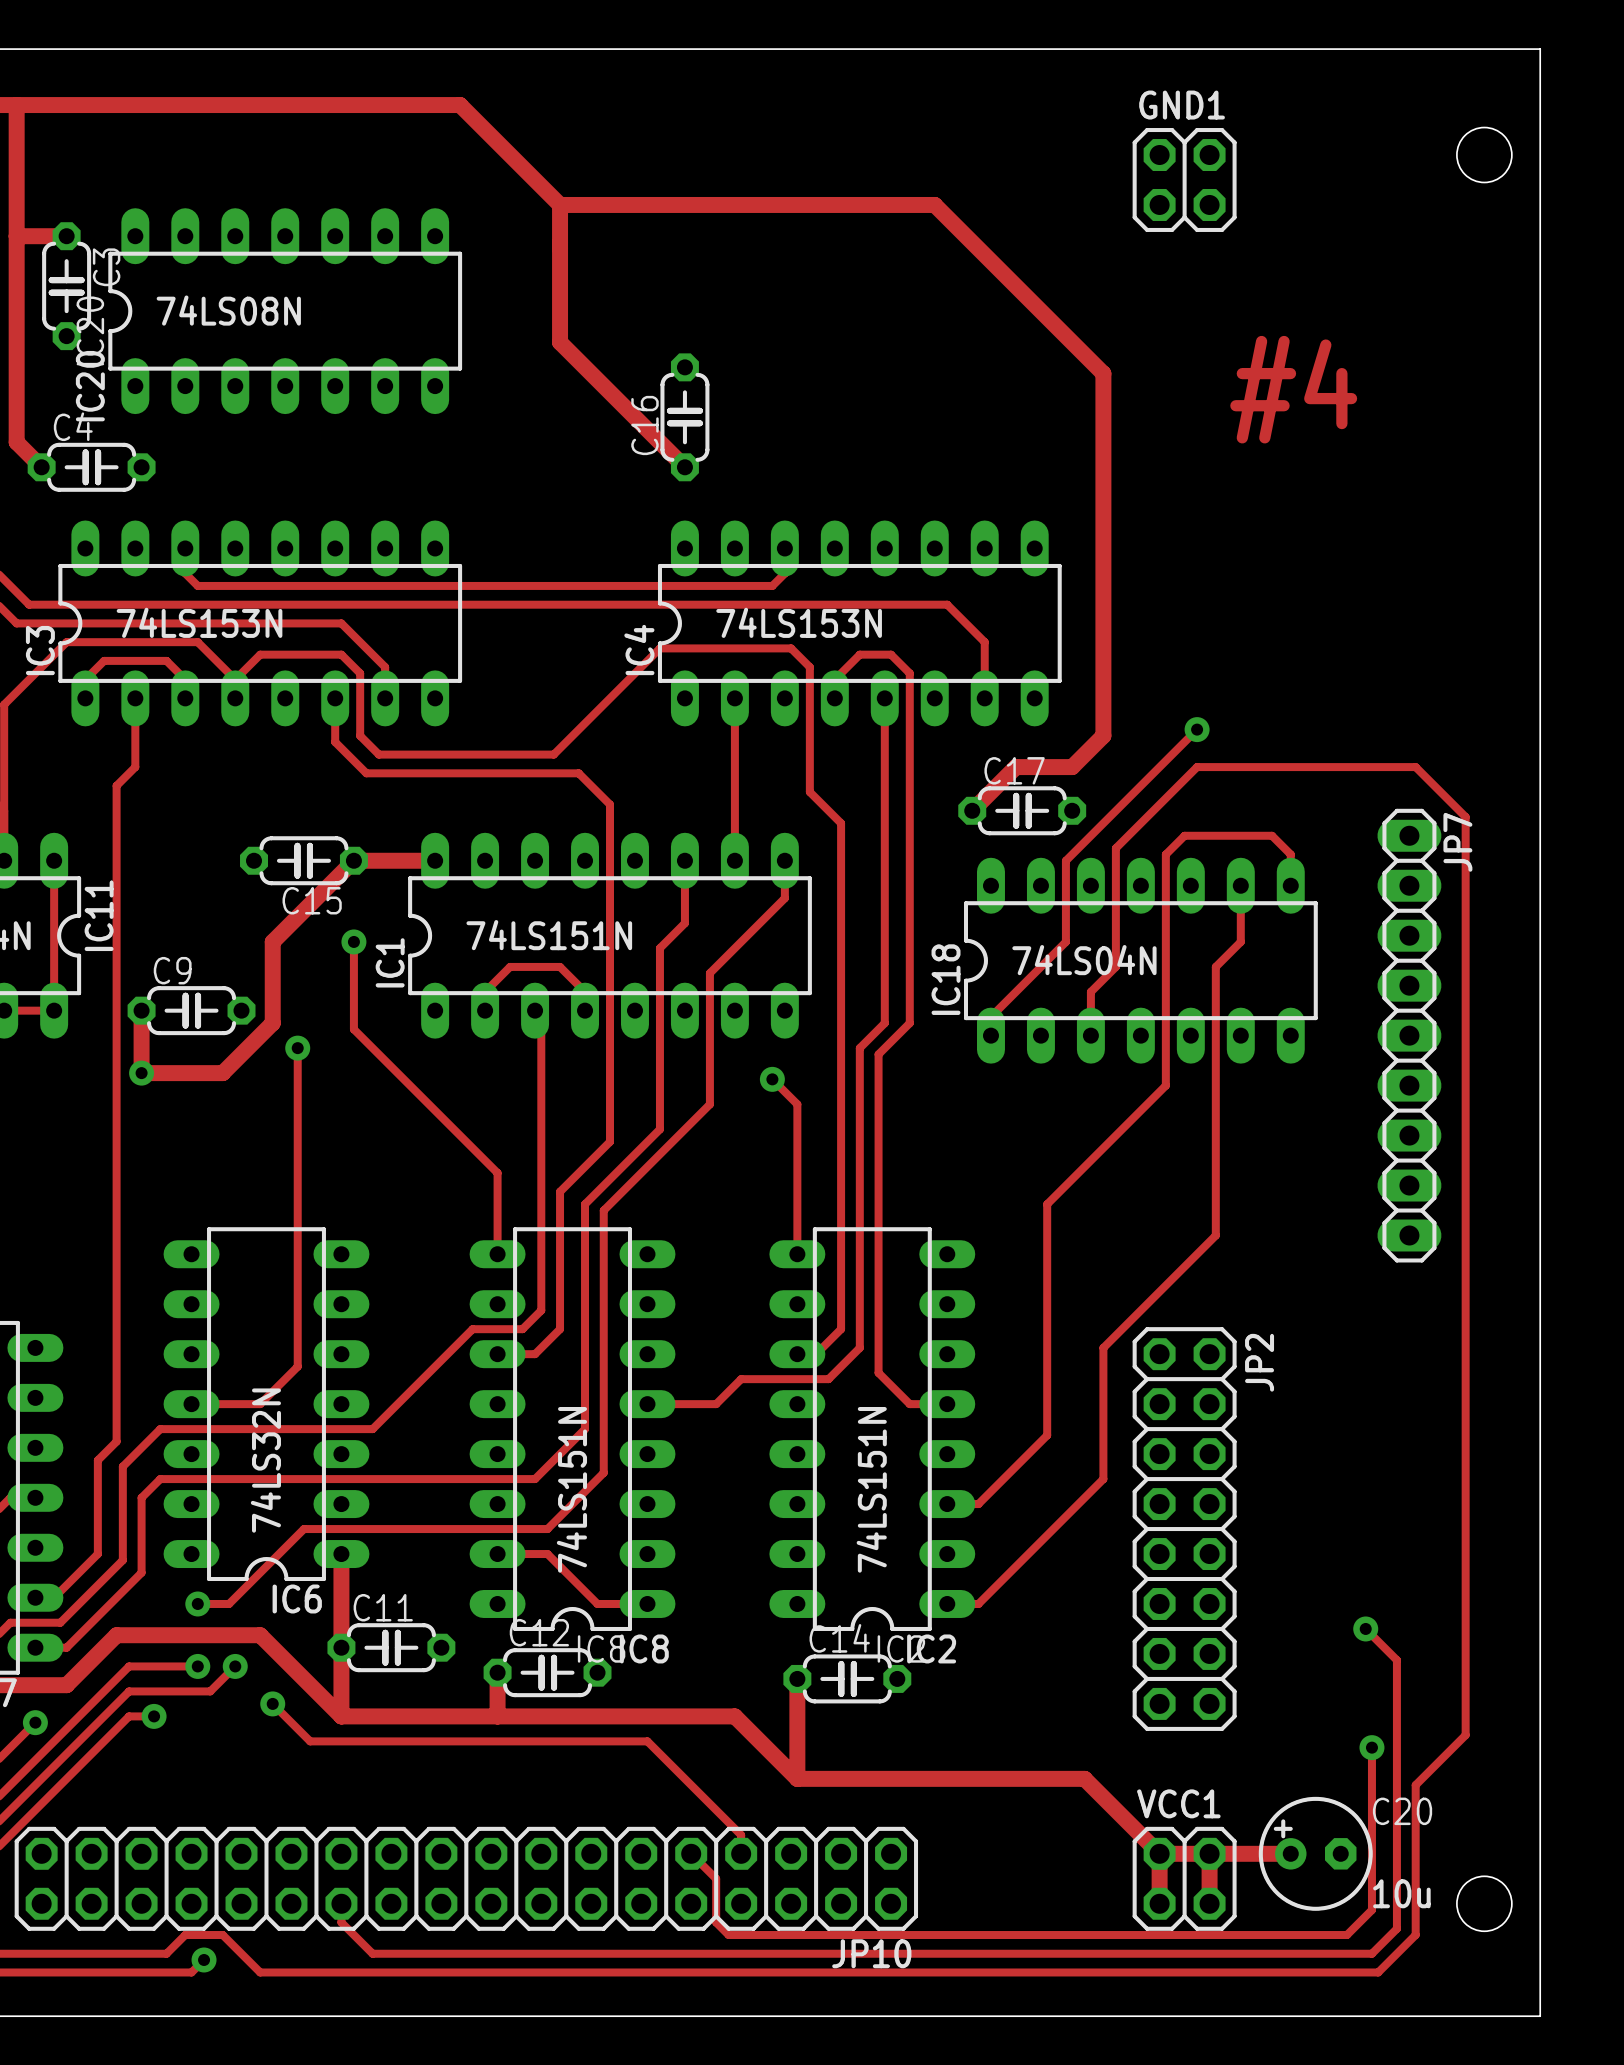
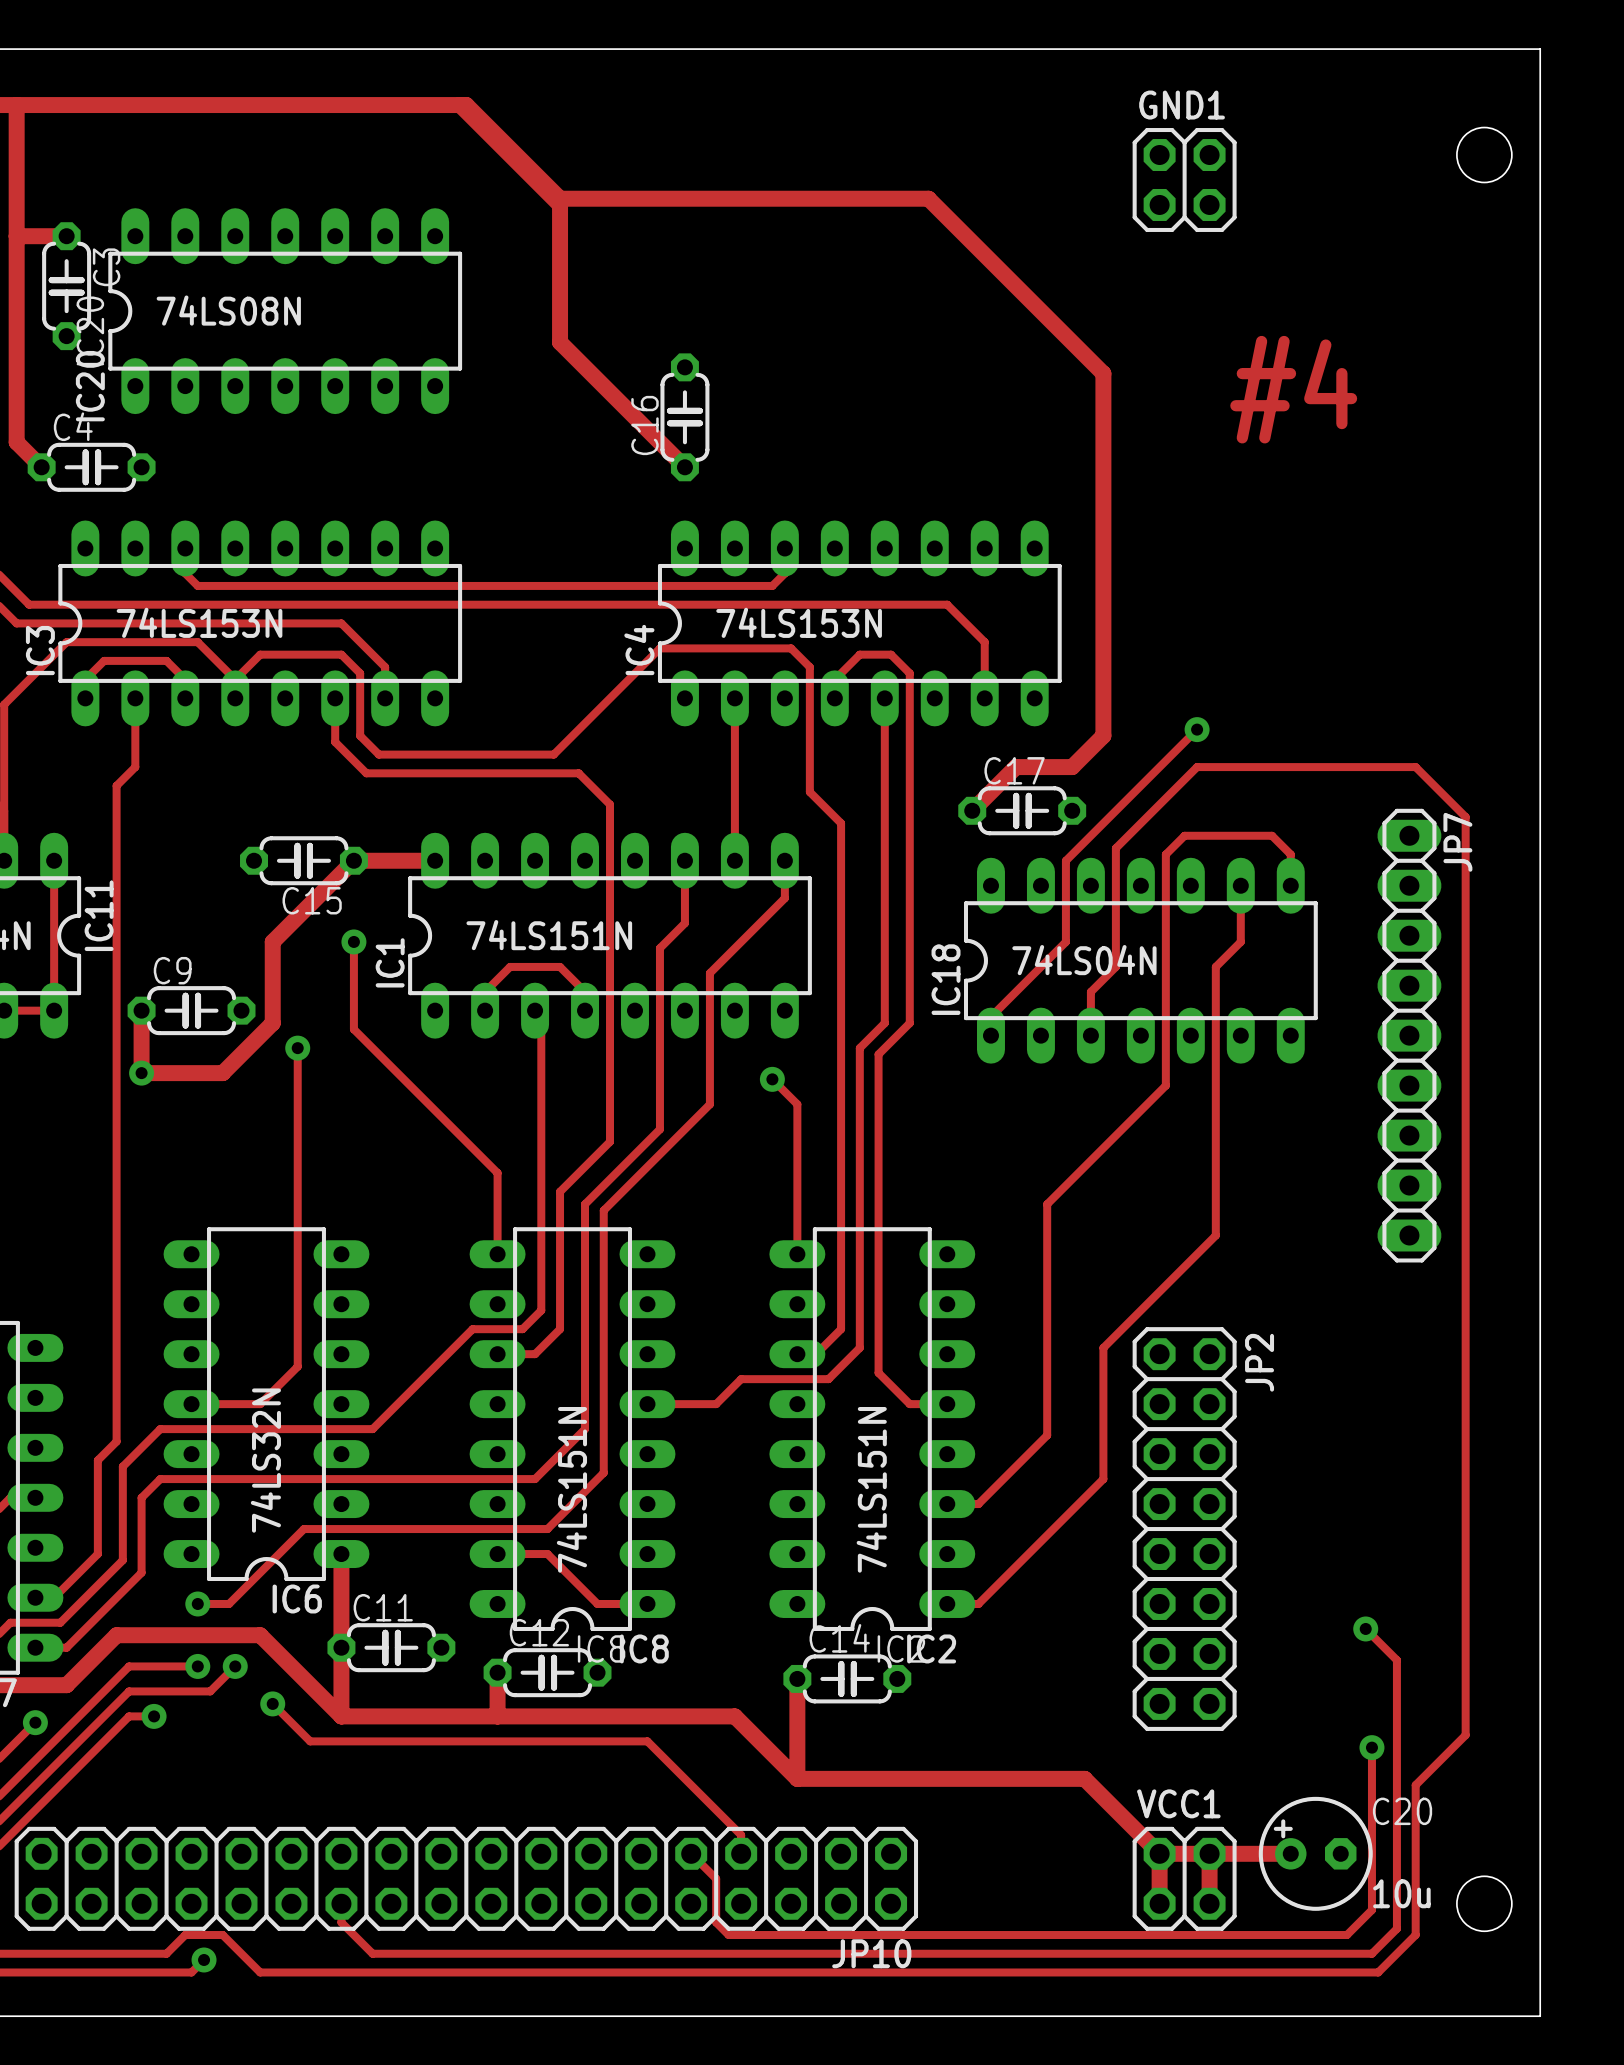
track: (560, 204) (934, 204) -> (460, 105) (466, 105) (560, 198) (928, 198) (934, 204)

